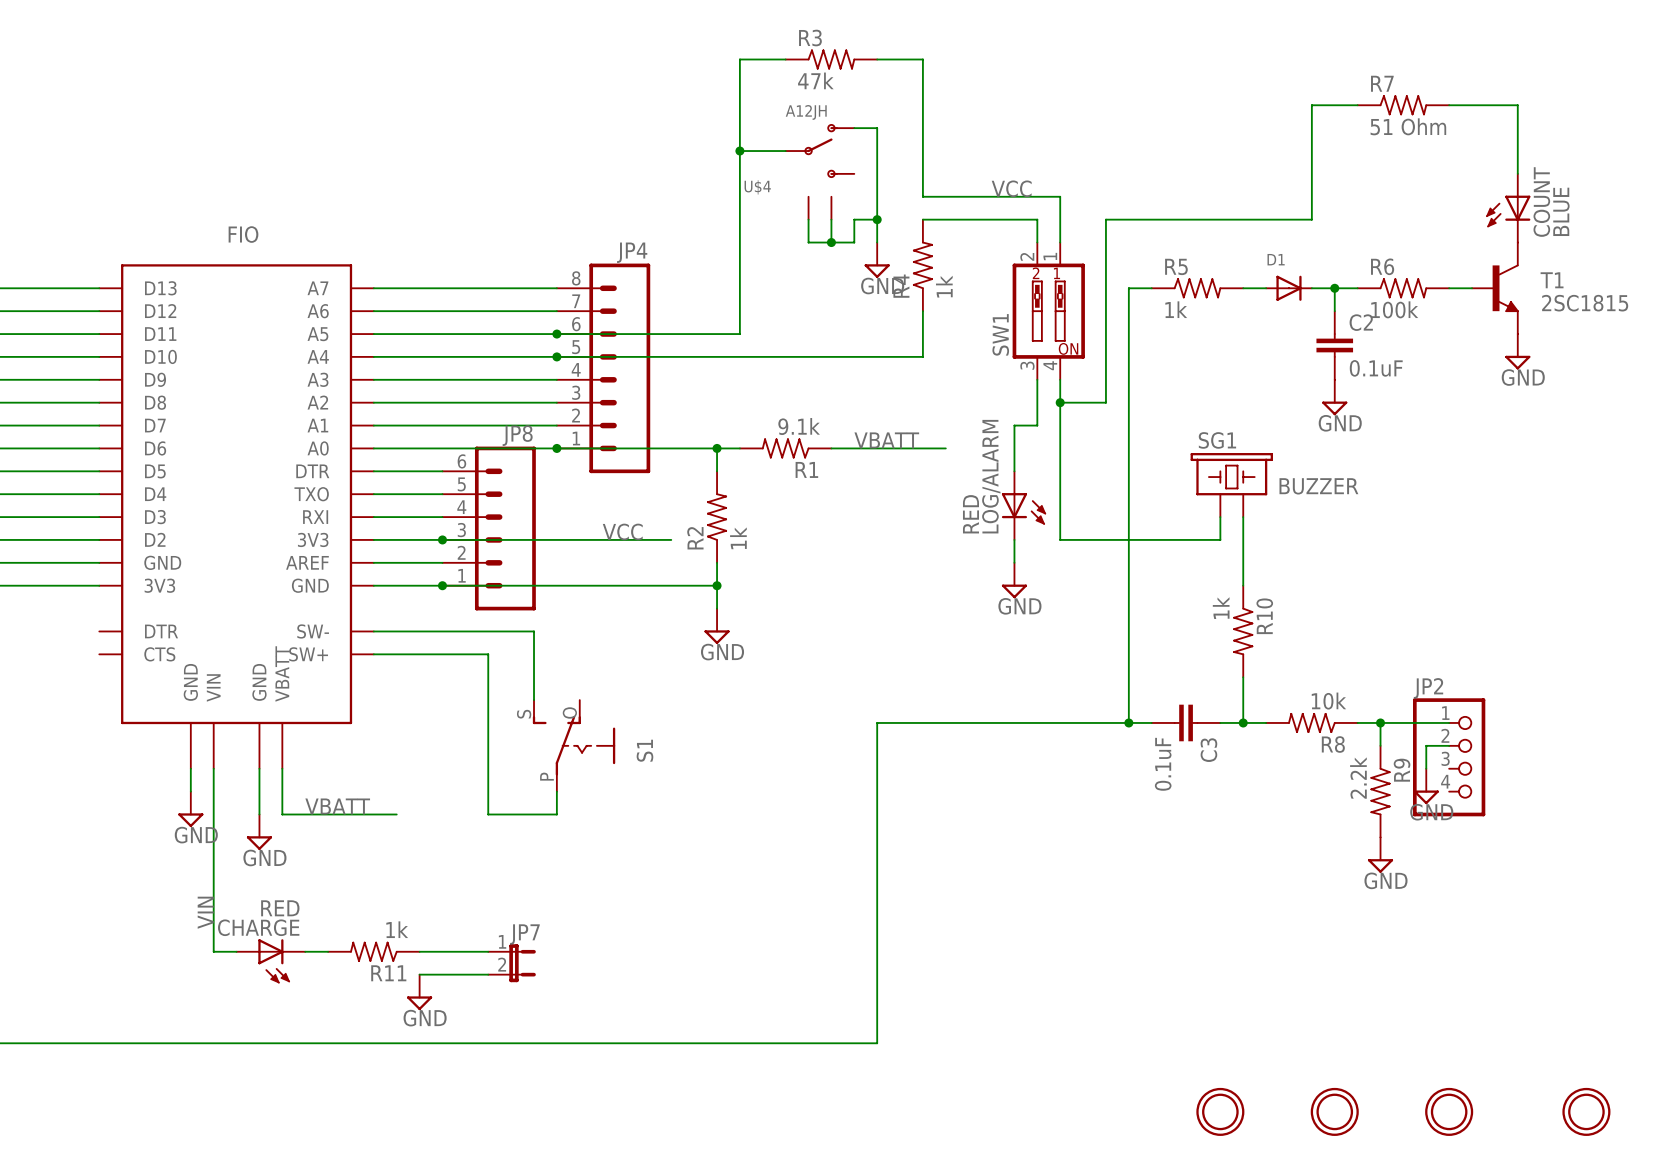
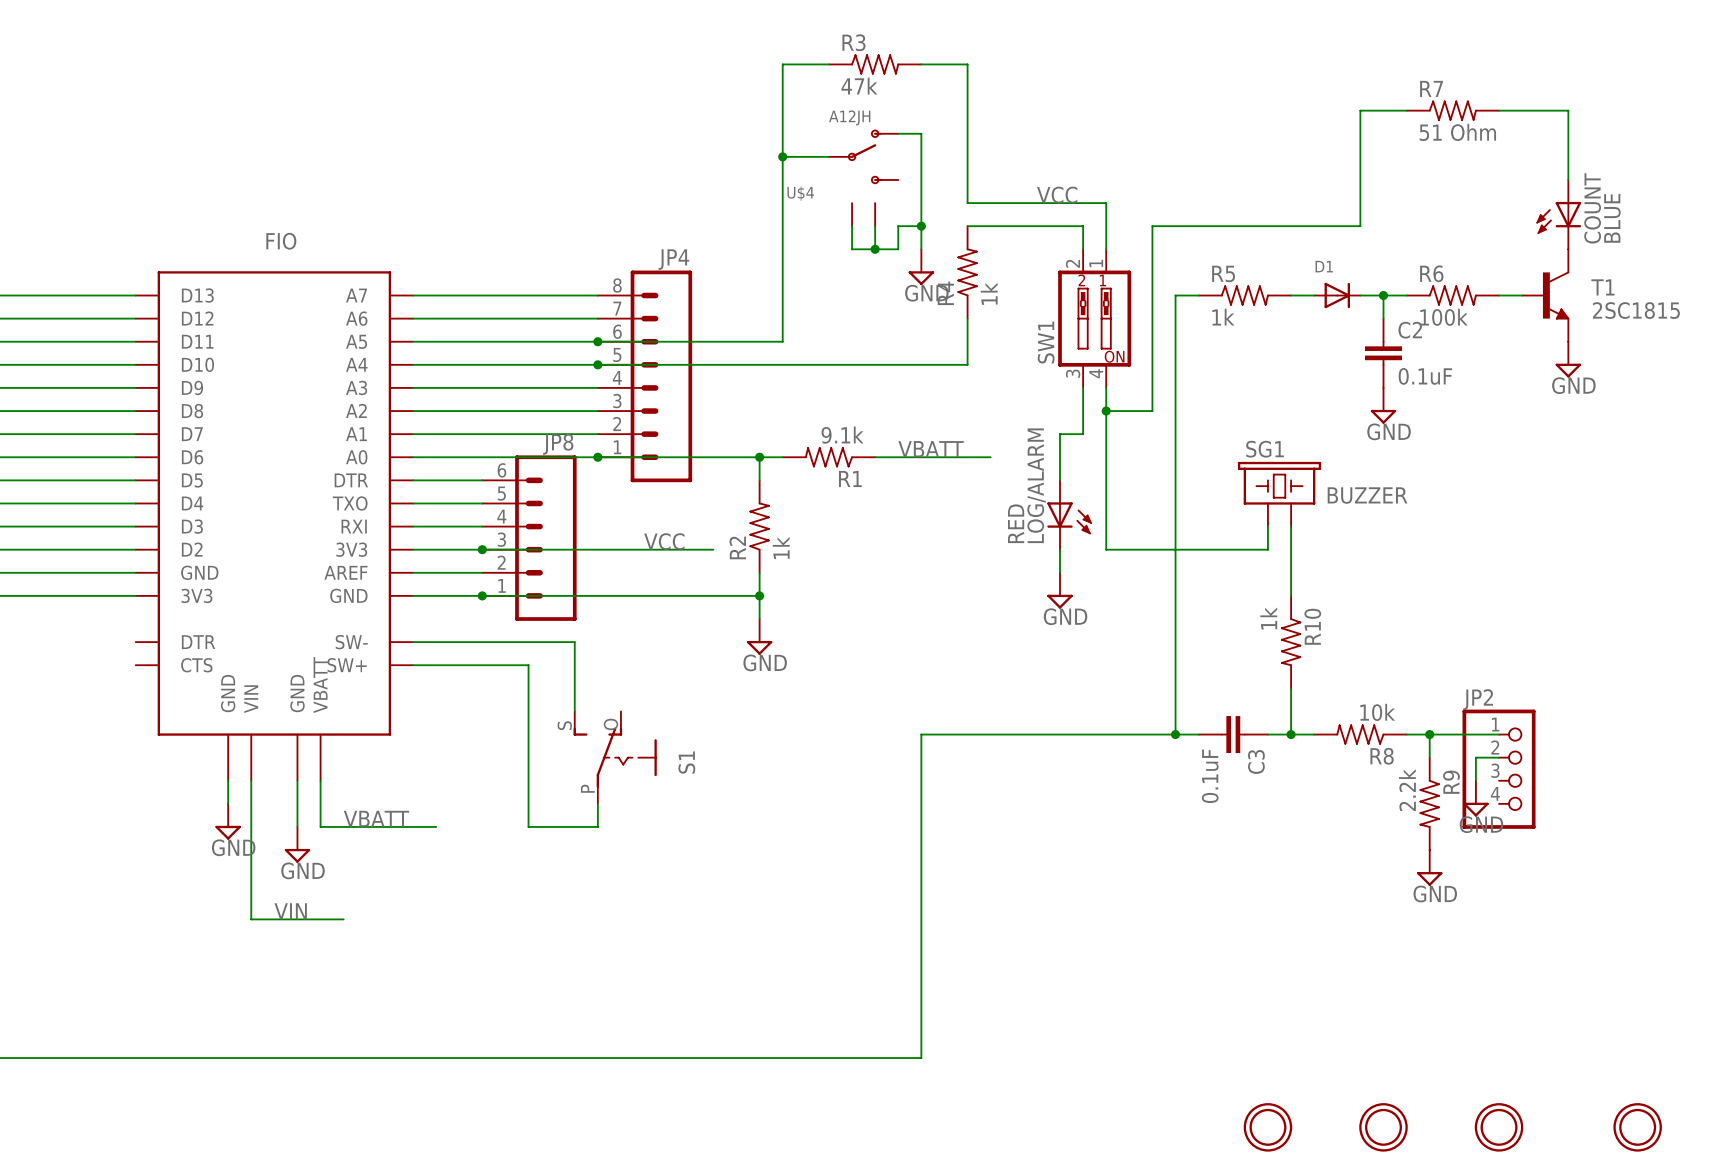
wire: (213, 906) (213, 951) (236, 951) -> (251, 919) (343, 919)
label rotation: 0° (205, 912) -> 90° clockwise (290, 911)
label position: VIN (205, 912) -> VIN (290, 911)
wire: (305, 951) (328, 951) -> none
R11: 1k (373, 951) -> none
wire: (419, 951) (488, 951) -> none
CHARGE: RED (270, 961) -> none
JP7: (512, 963) -> none
wire: (419, 974) (488, 974) -> none
power symbol: GND (419, 992) -> none

